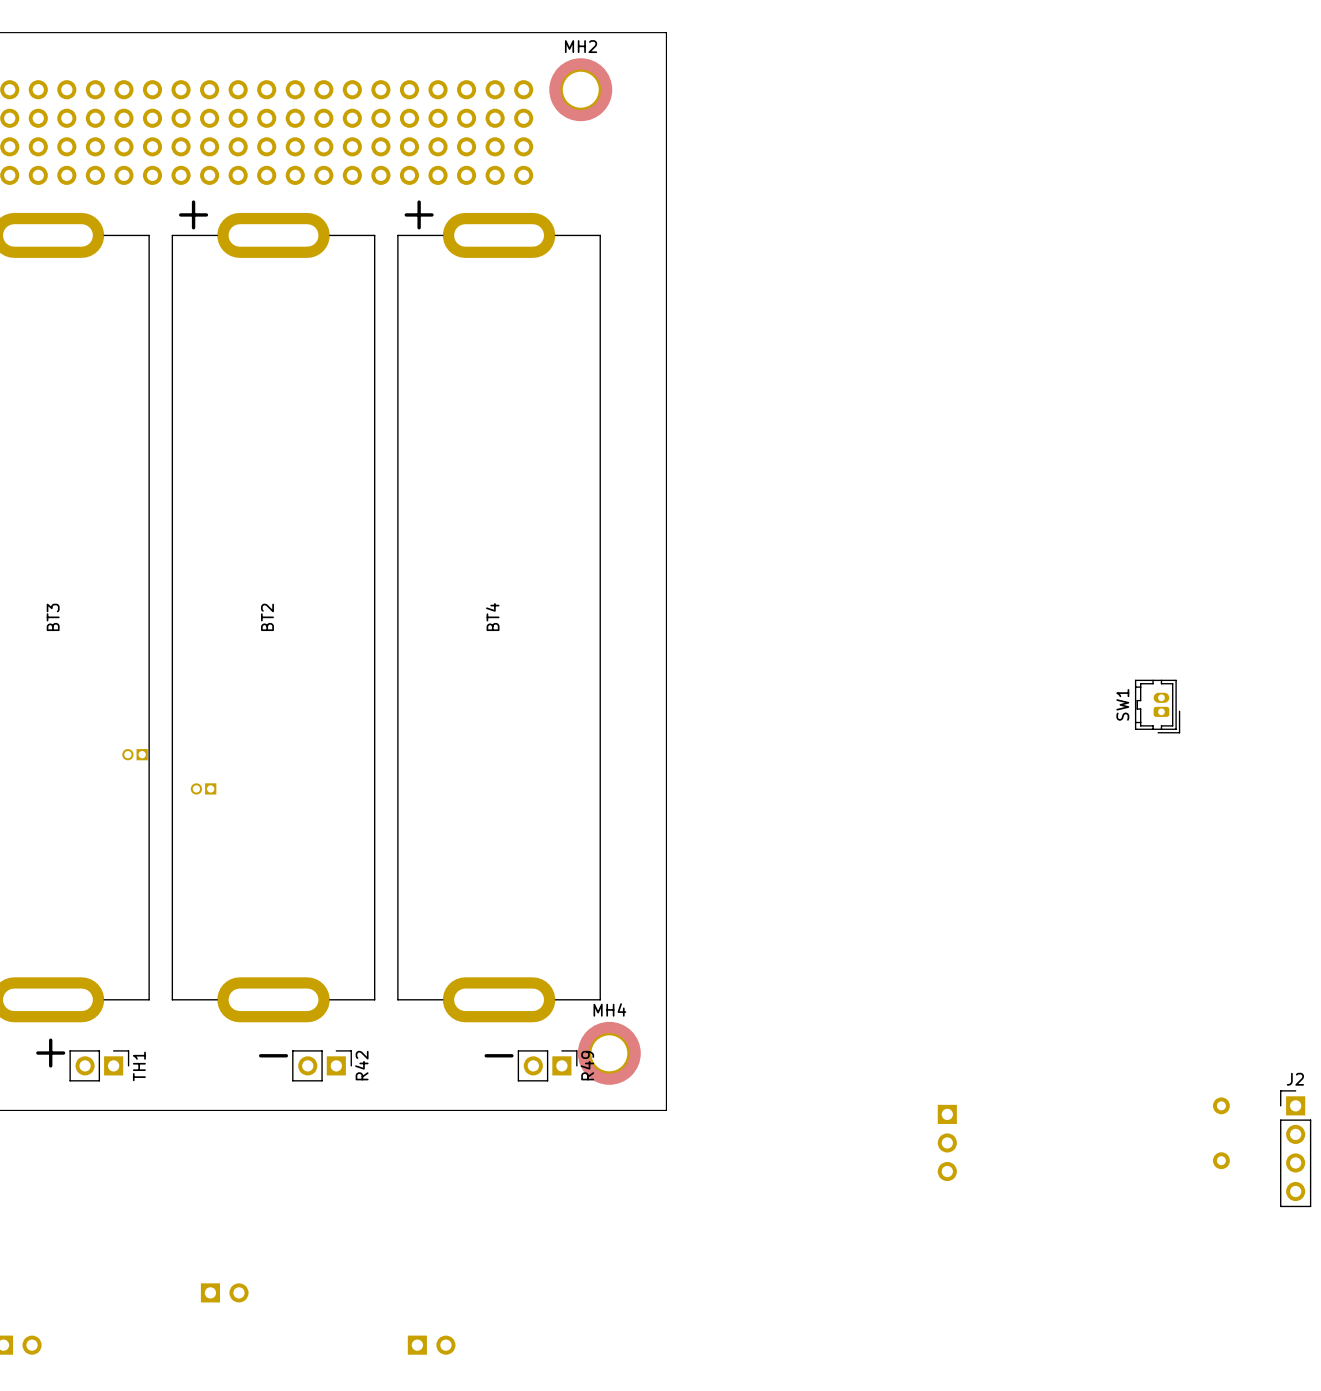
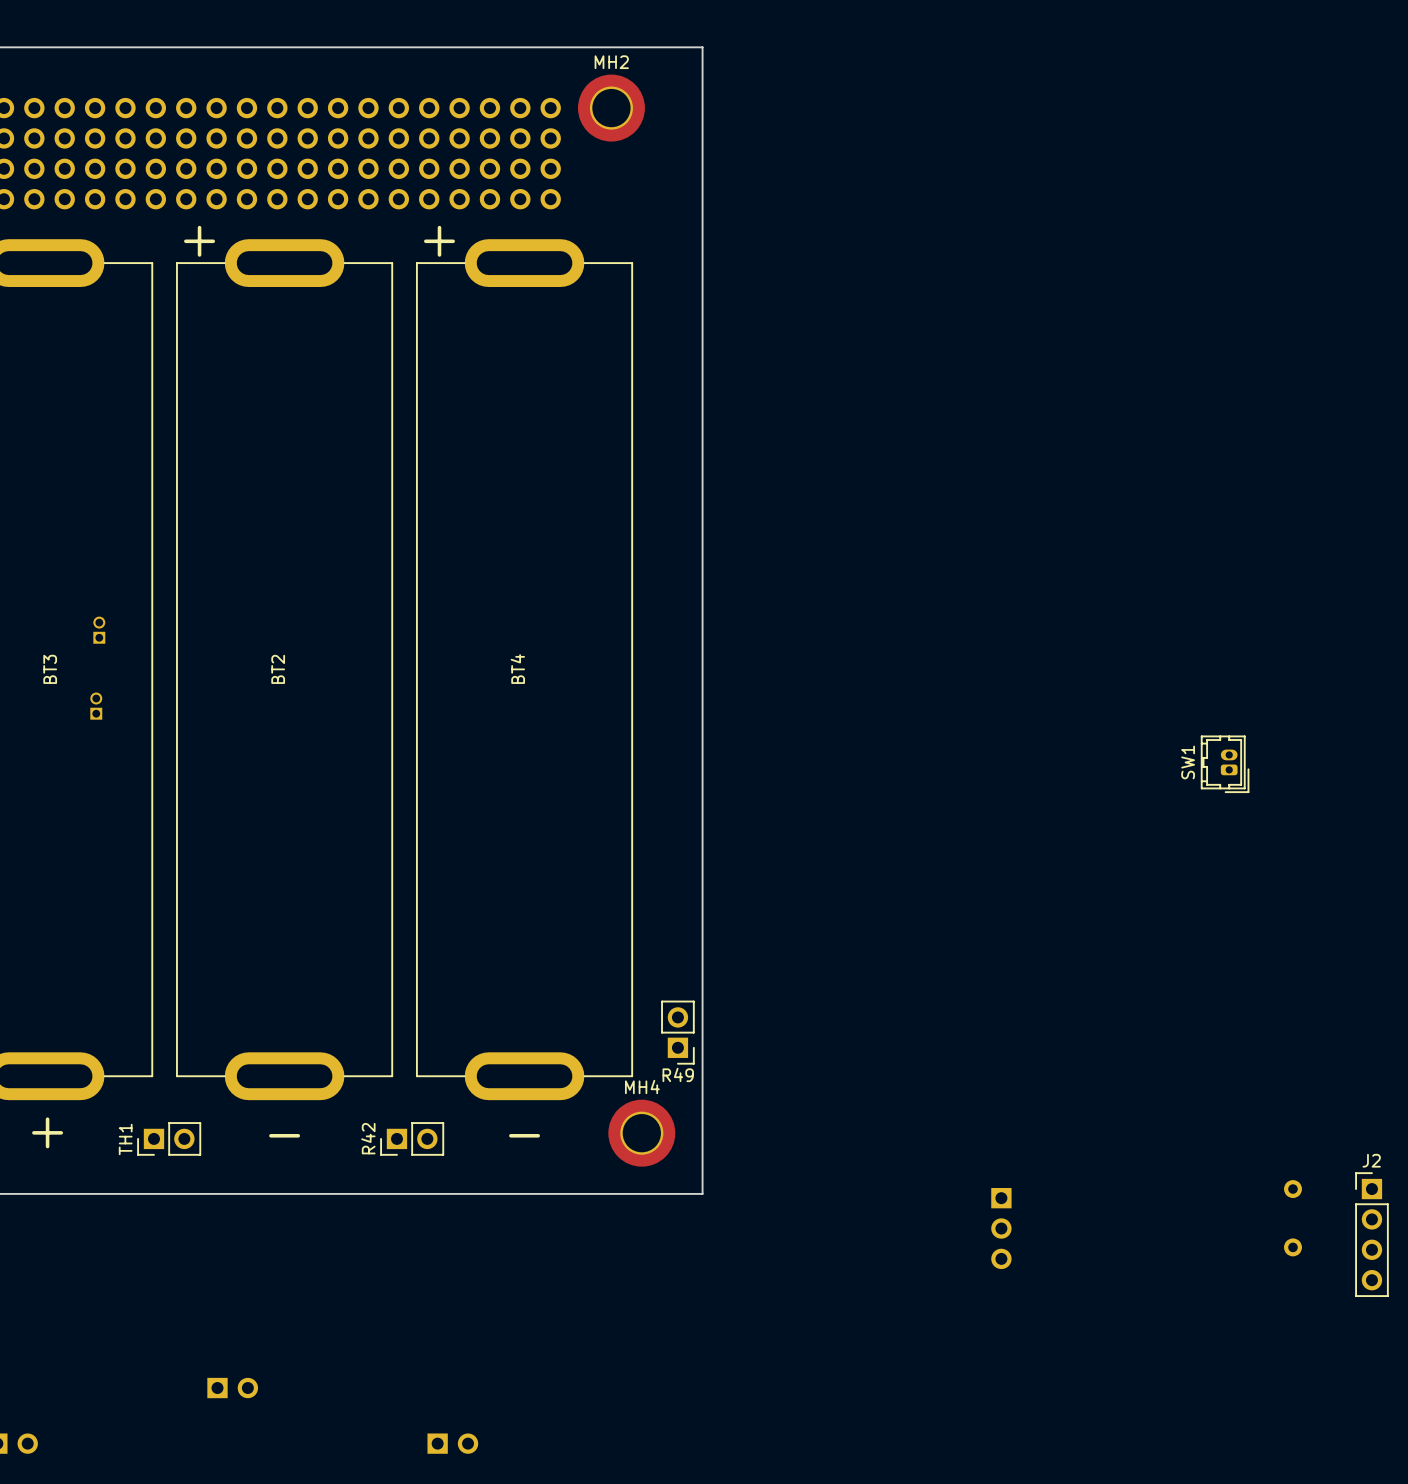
part: none -> (99, 630)
part: none -> (96, 706)
part: (135, 754) -> none
part: (203, 788) -> none
TH1 rotation: 0° (99, 1065) -> 180° (169, 1138)
TH1 position: (99, 1065) -> (169, 1138)
R42 rotation: 0° (322, 1065) -> 180° (412, 1138)
R42 position: (322, 1065) -> (412, 1138)
R49 rotation: 0° (547, 1065) -> 90° clockwise (677, 1032)
R49 position: (547, 1065) -> (677, 1032)

